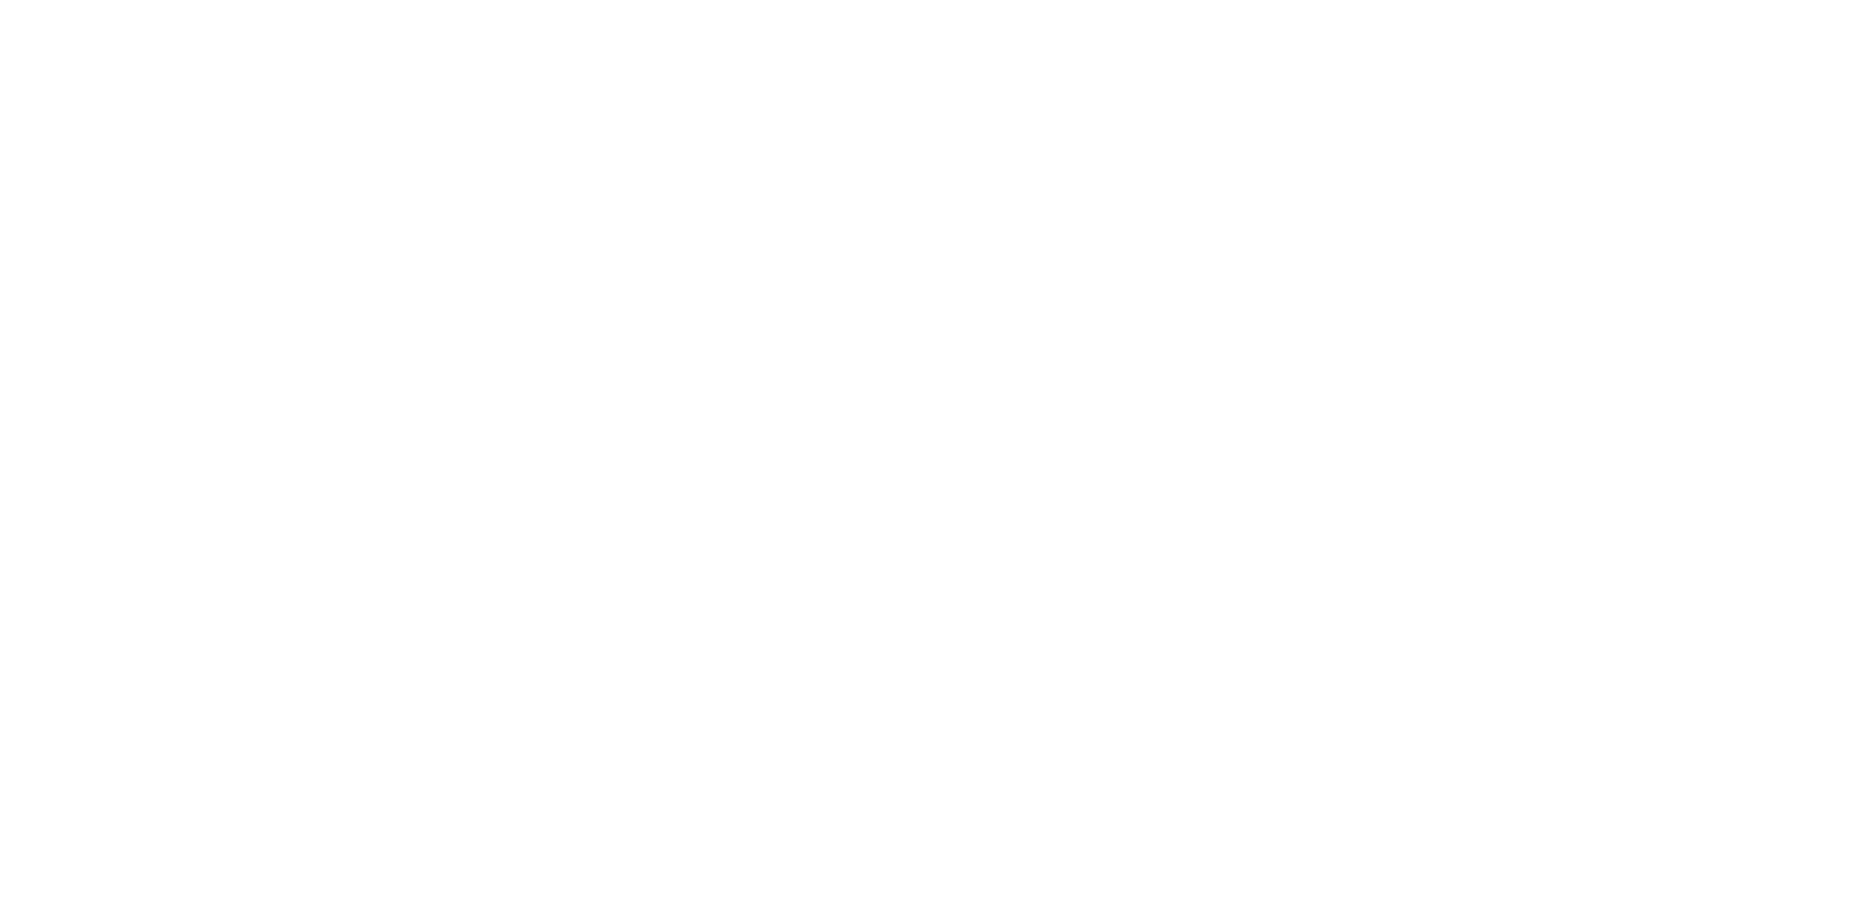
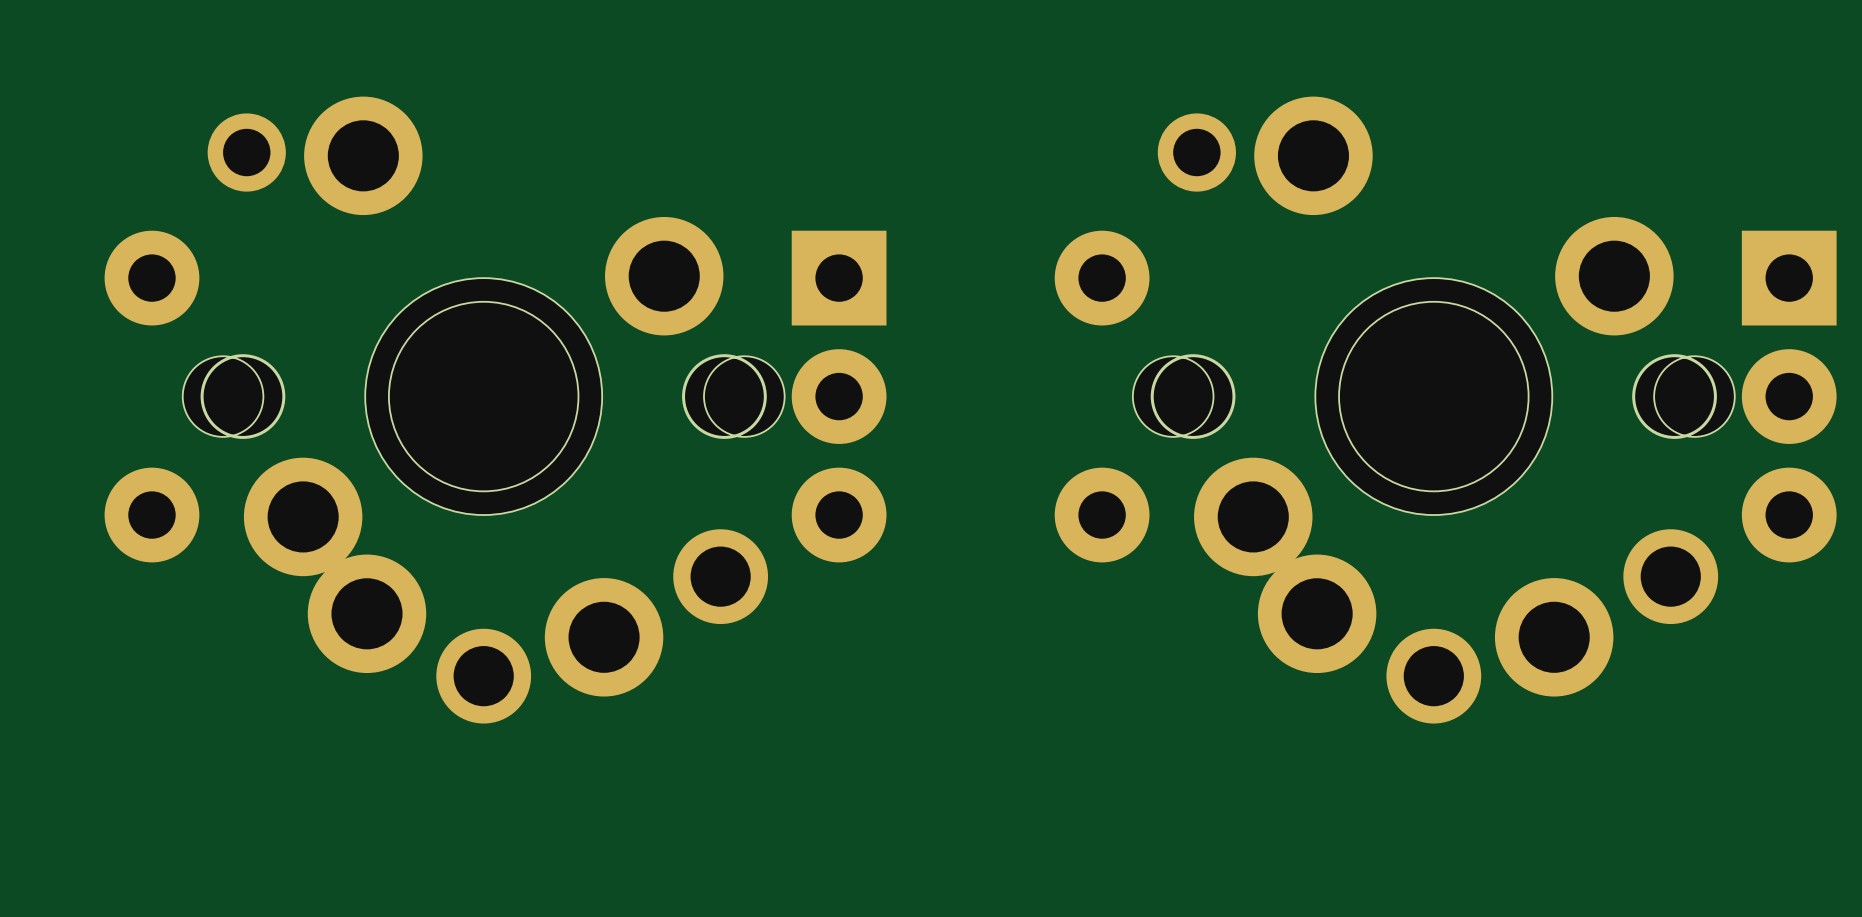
part: none -> (495, 410)
part: none -> (1445, 410)

